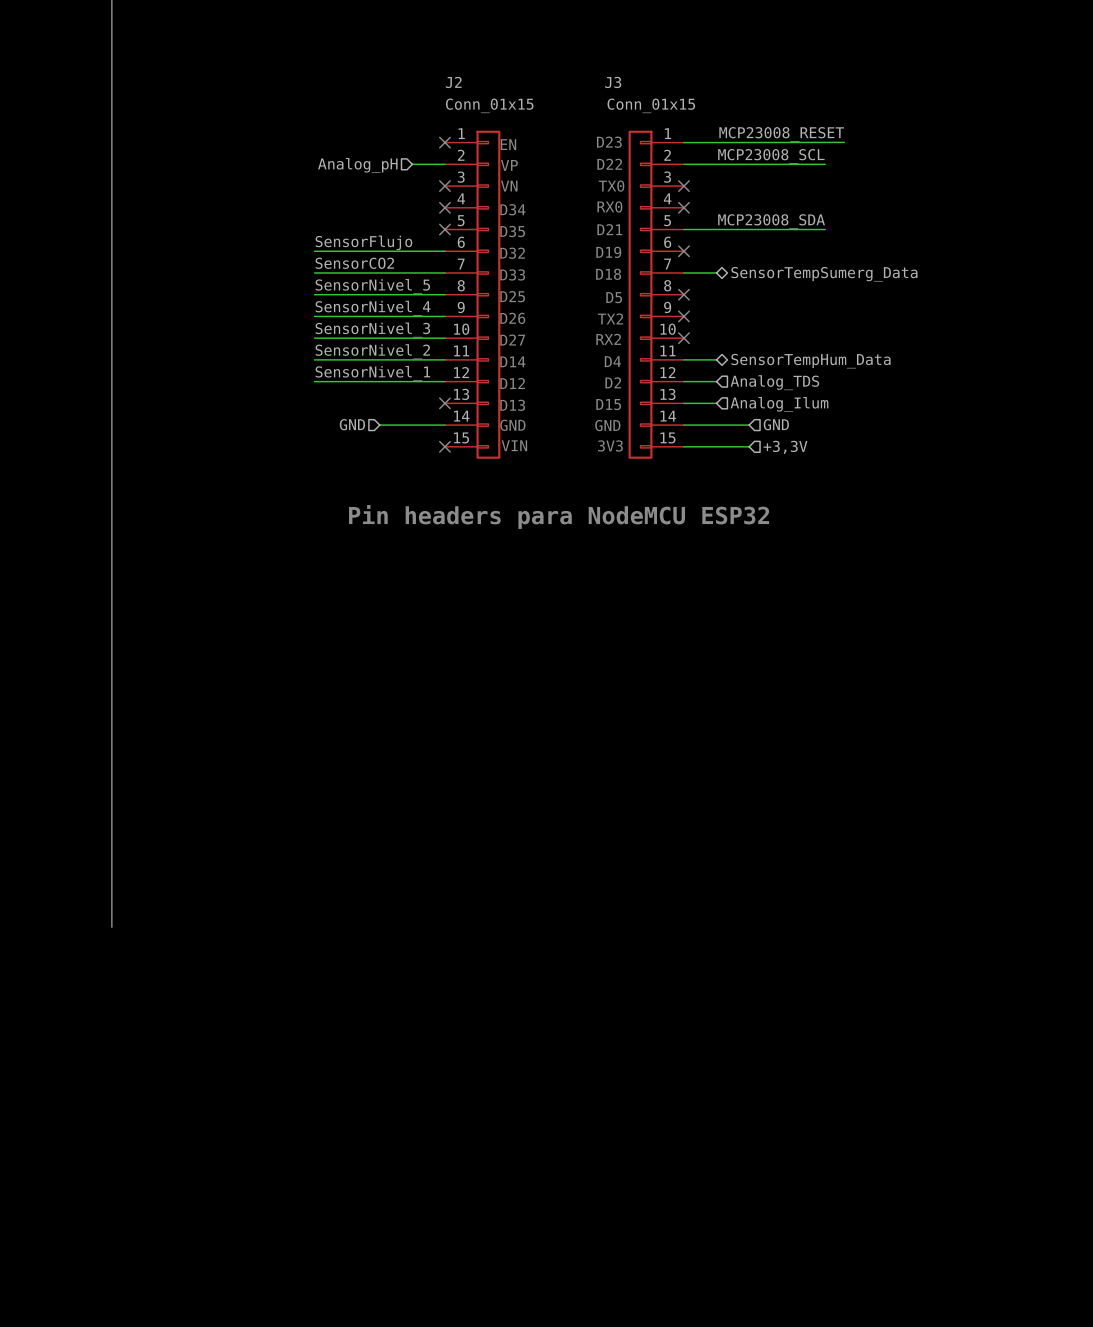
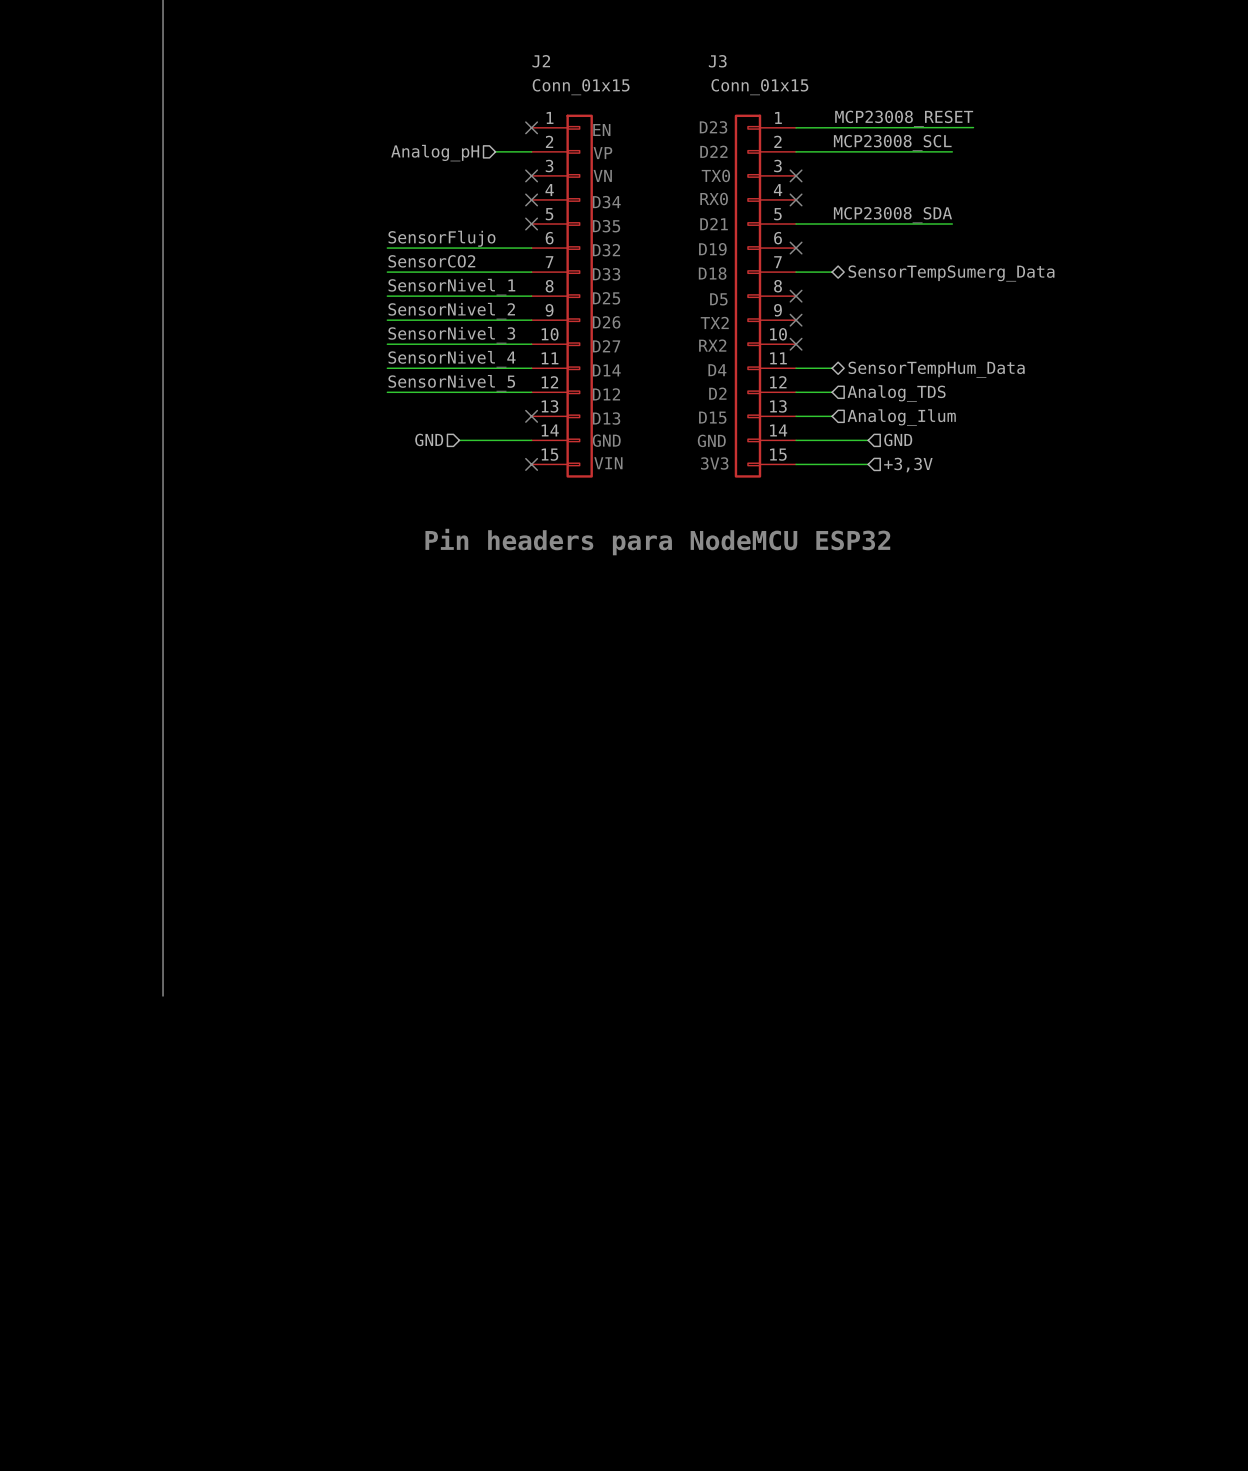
label: SensorNivel_5 (372, 286) -> SensorNivel_1 (451, 287)
label: SensorNivel_4 (373, 308) -> SensorNivel_2 (451, 311)
label: SensorNivel_2 (372, 351) -> SensorNivel_4 (452, 359)
label: SensorNivel_1 (372, 373) -> SensorNivel_5 (451, 383)

